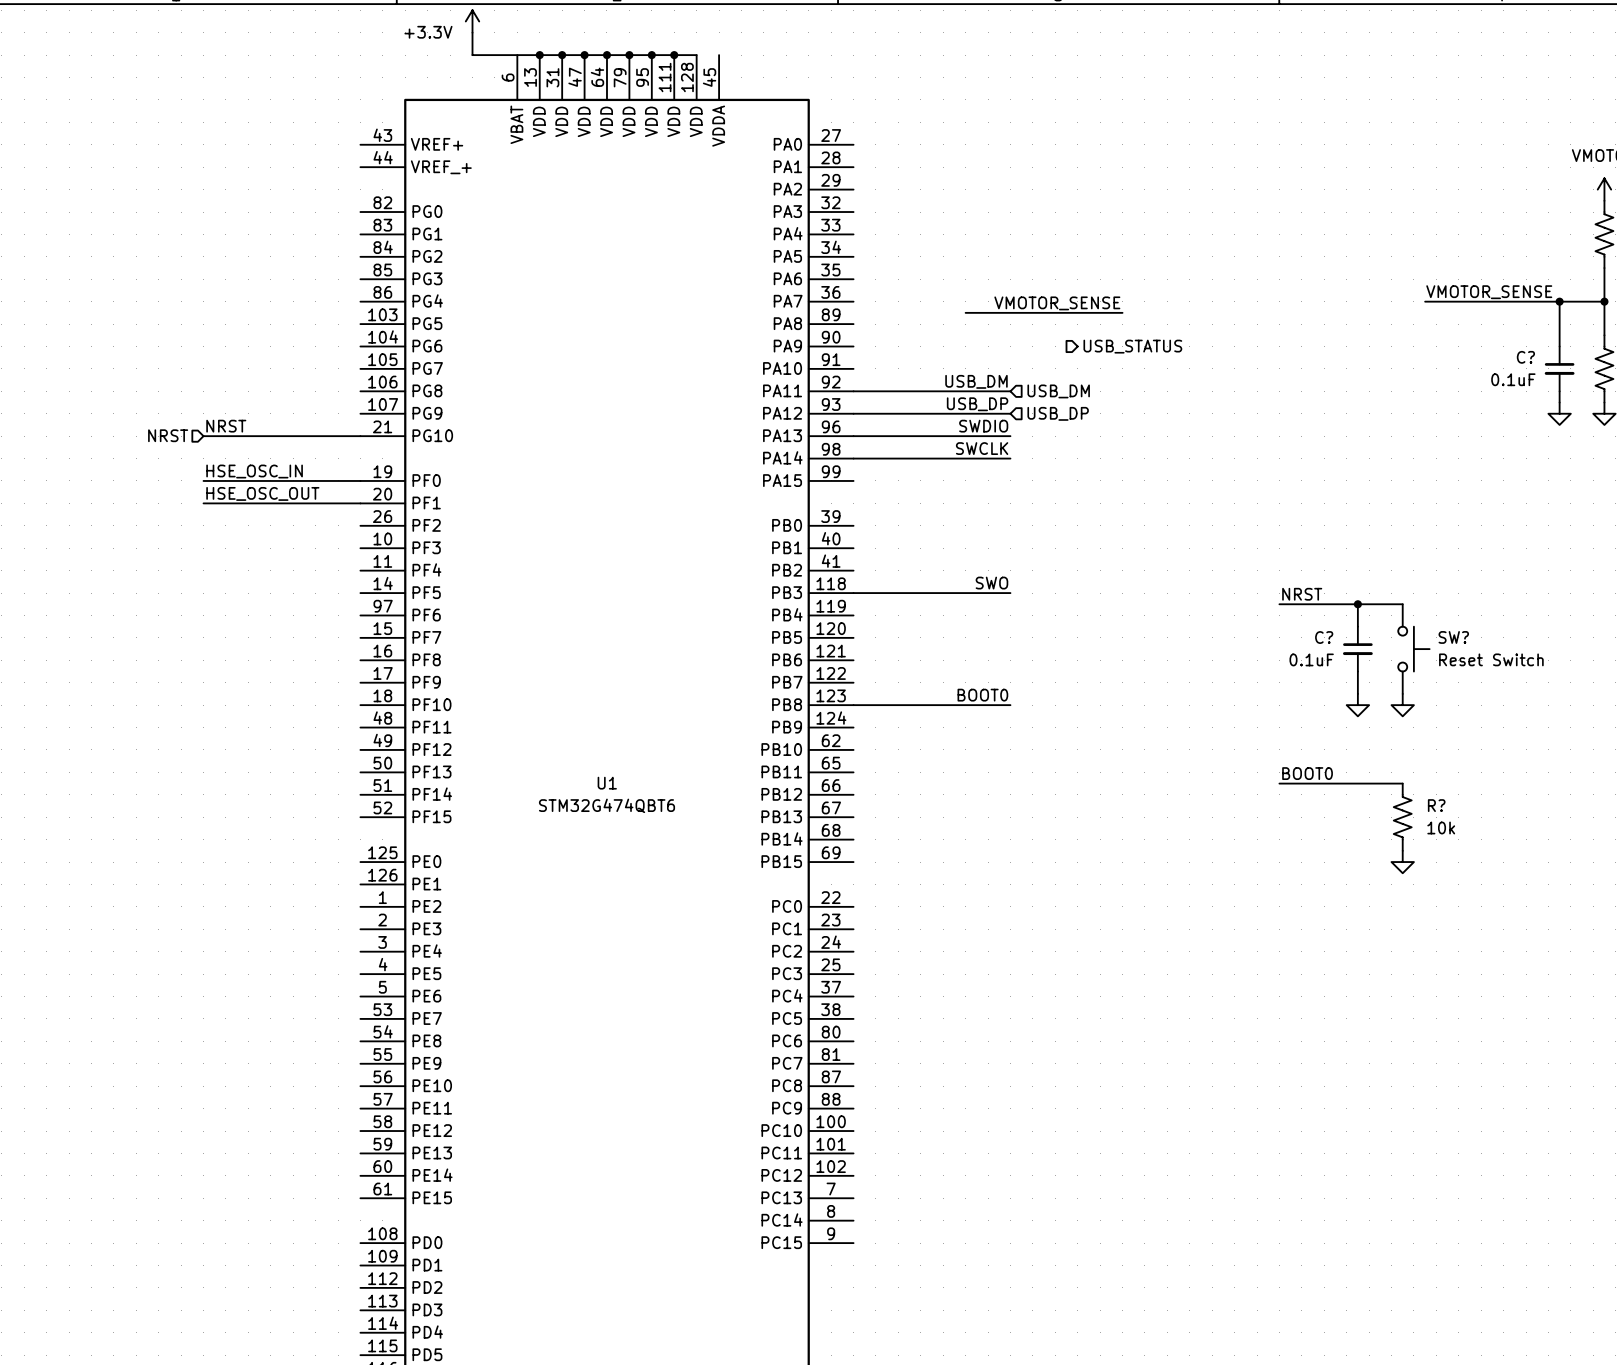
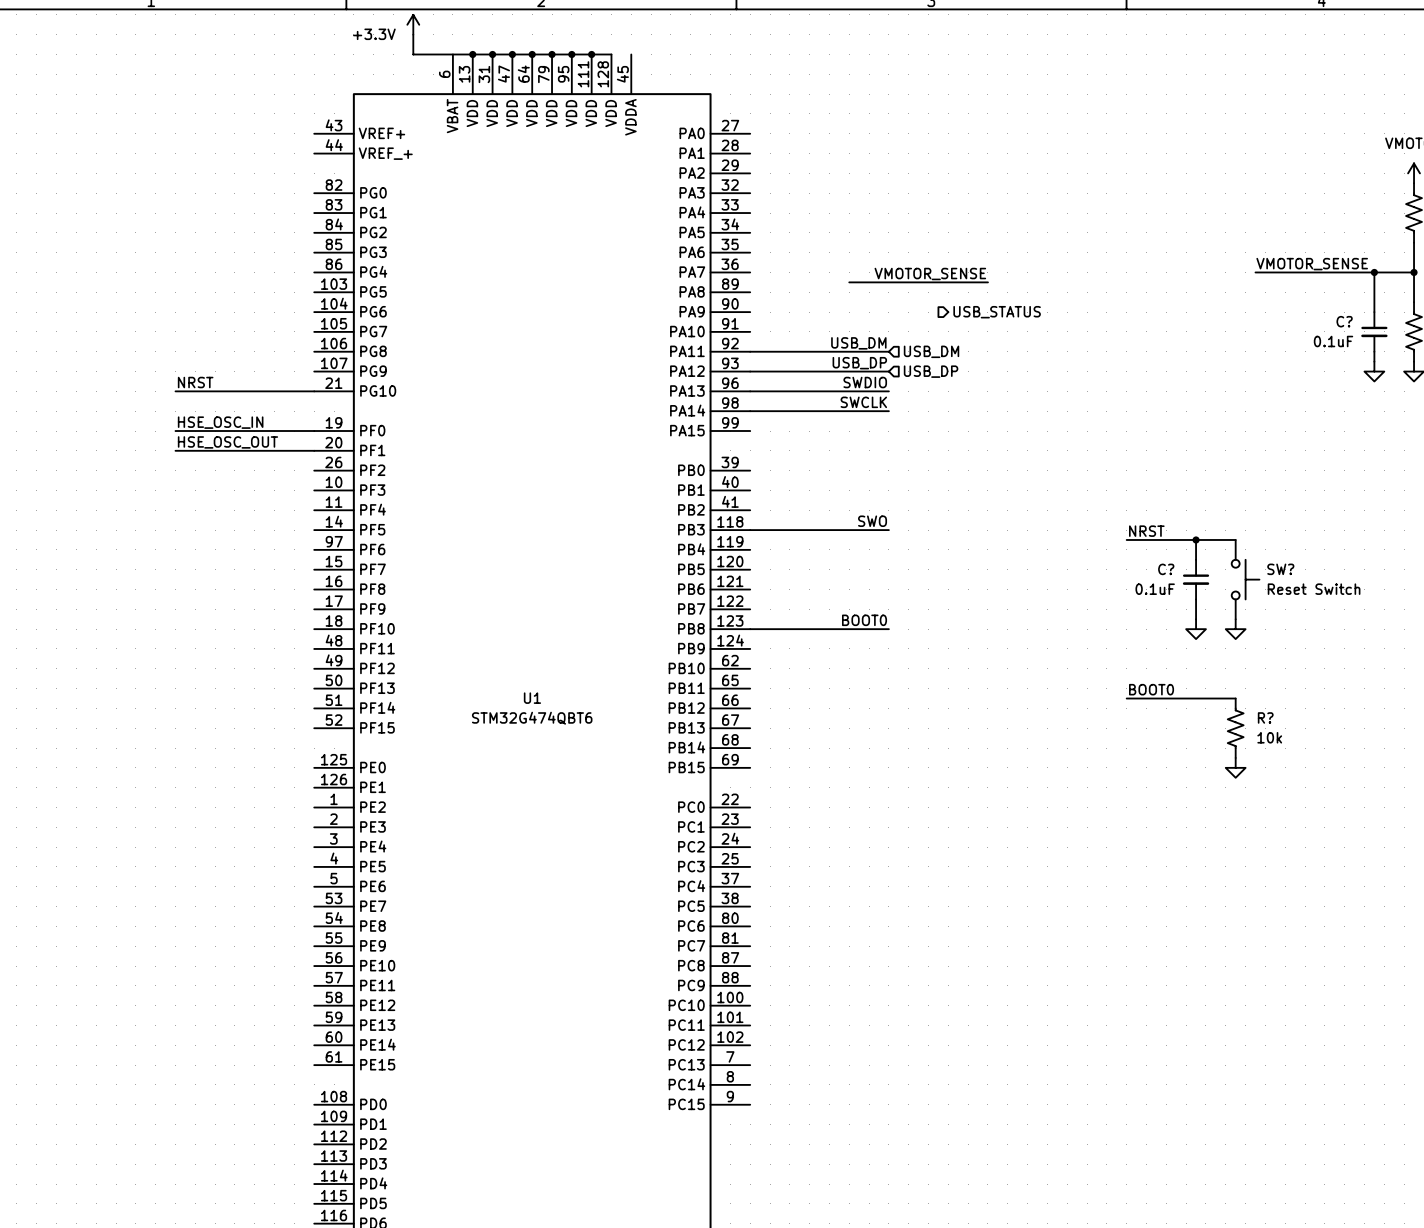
hierarchical label: NRST (168, 435) -> none

